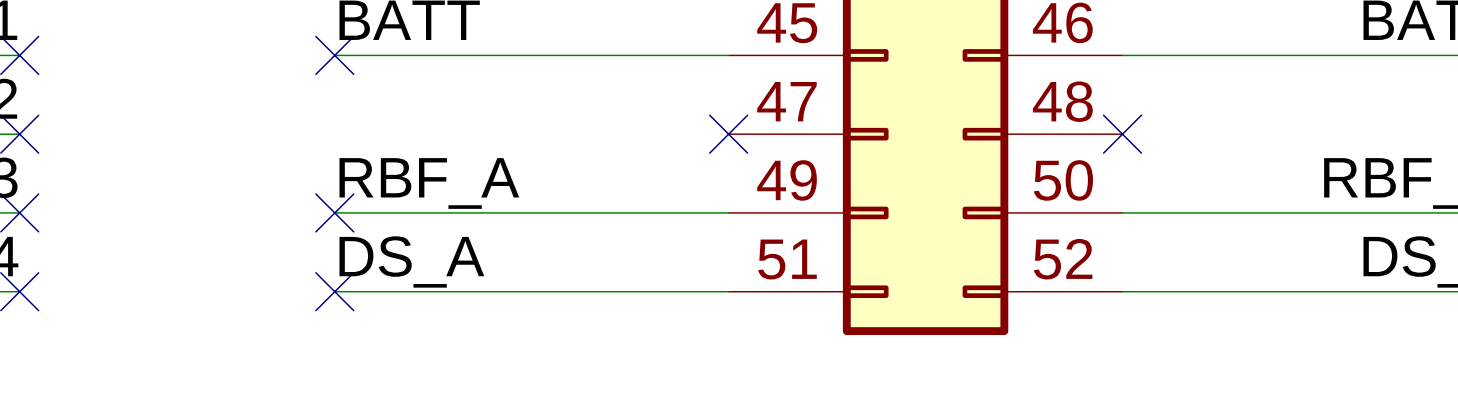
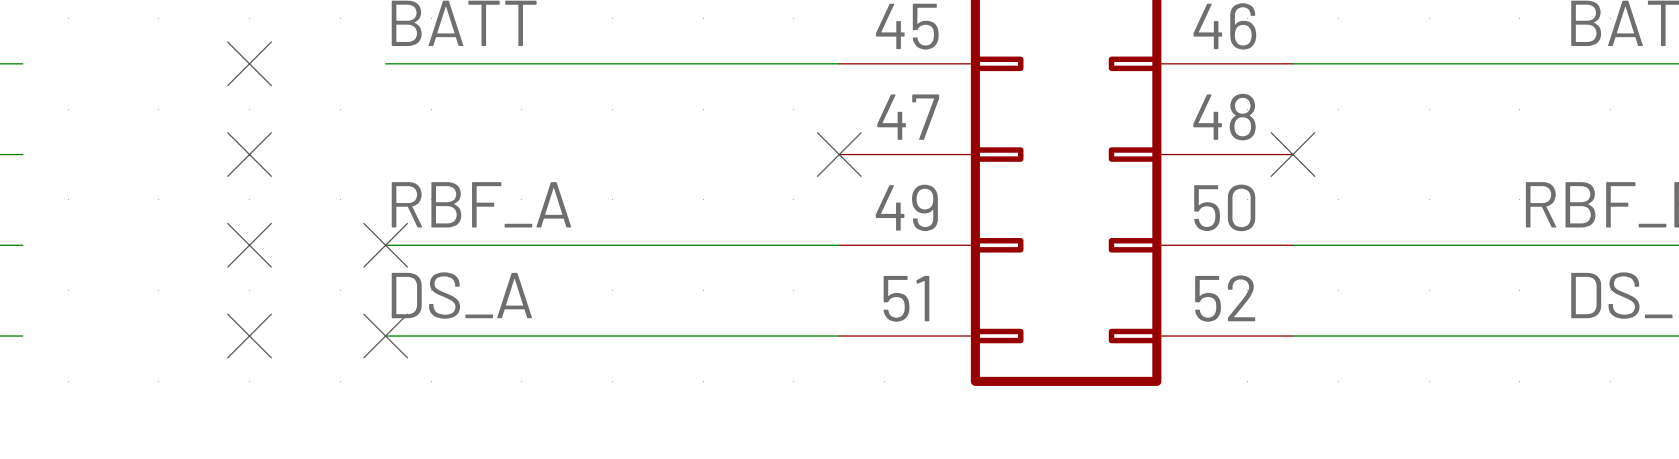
no-connect mark: (19, 55) -> none
no-connect mark: none -> (249, 63)
no-connect mark: (334, 55) -> none
no-connect mark: (19, 134) -> none
no-connect mark: none -> (249, 154)
no-connect mark: (19, 212) -> none
no-connect mark: none -> (249, 245)
no-connect mark: (19, 291) -> none
no-connect mark: none -> (249, 336)

